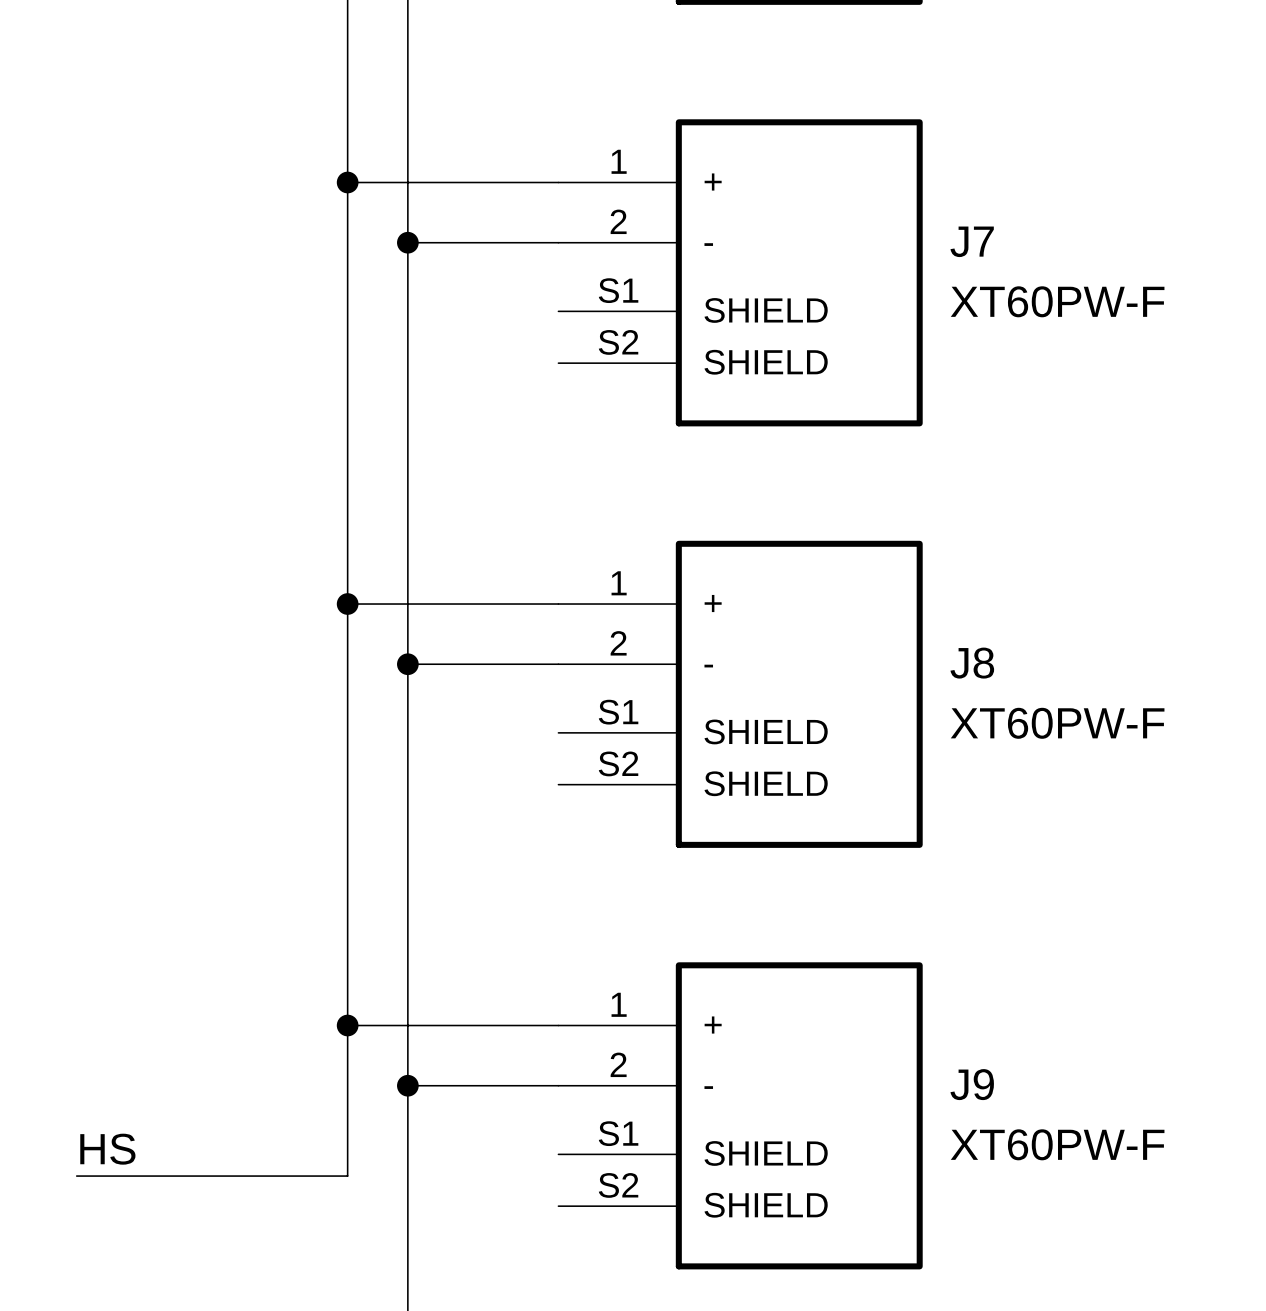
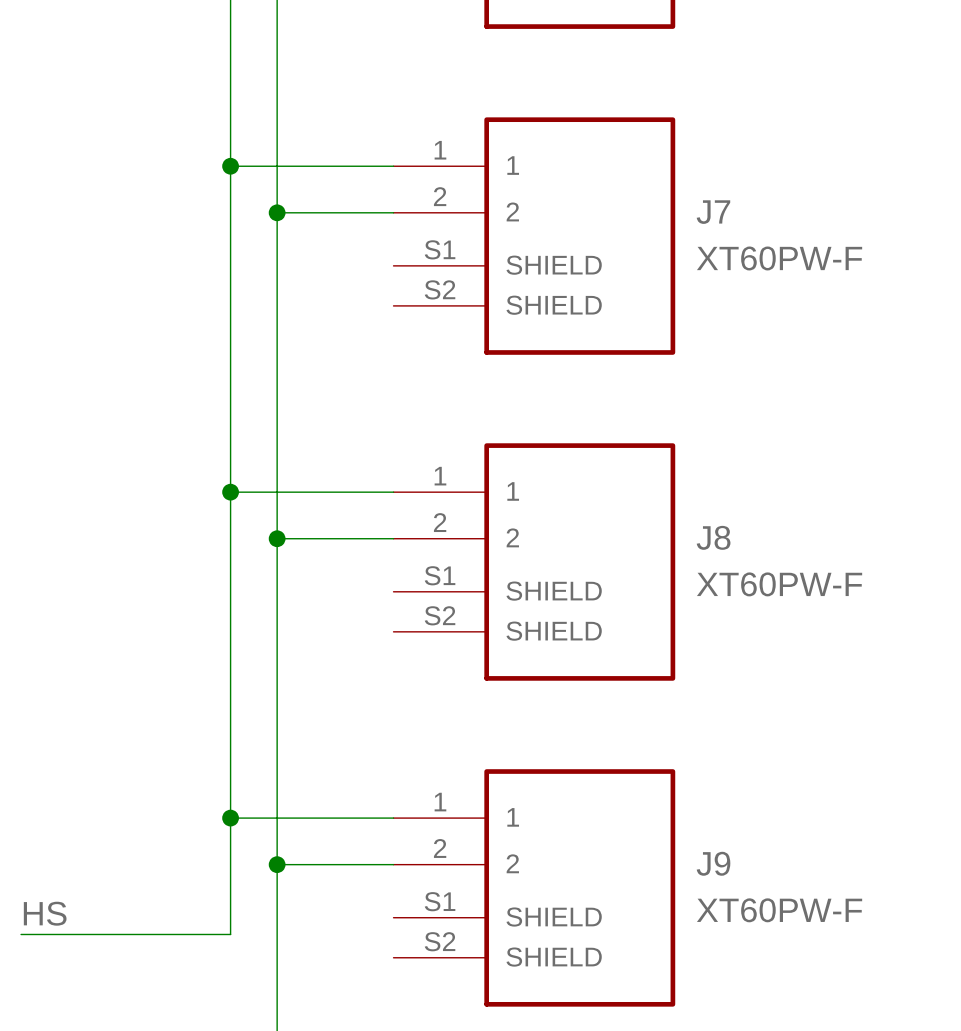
J7 pin name: + (713, 182) -> 1 (513, 165)
J7 pin name: - (708, 244) -> 2 (512, 211)
J8 pin name: + (713, 603) -> 1 (513, 491)
J8 pin name: - (708, 666) -> 2 (512, 537)
J9 pin name: + (713, 1025) -> 1 (513, 817)
J9 pin name: - (708, 1087) -> 2 (512, 863)

